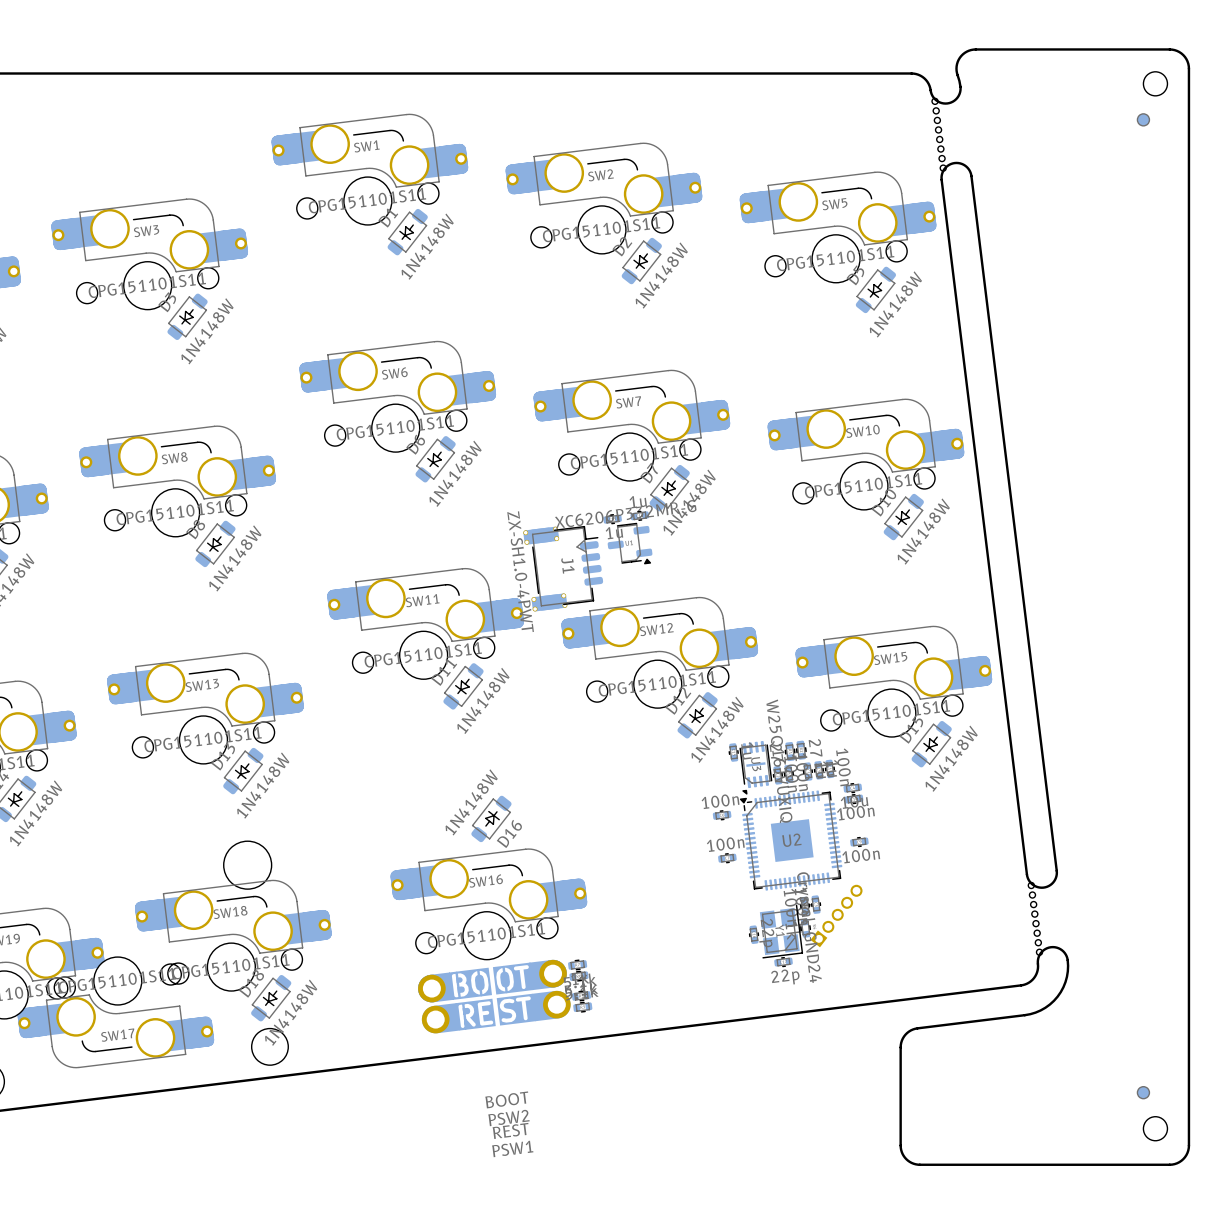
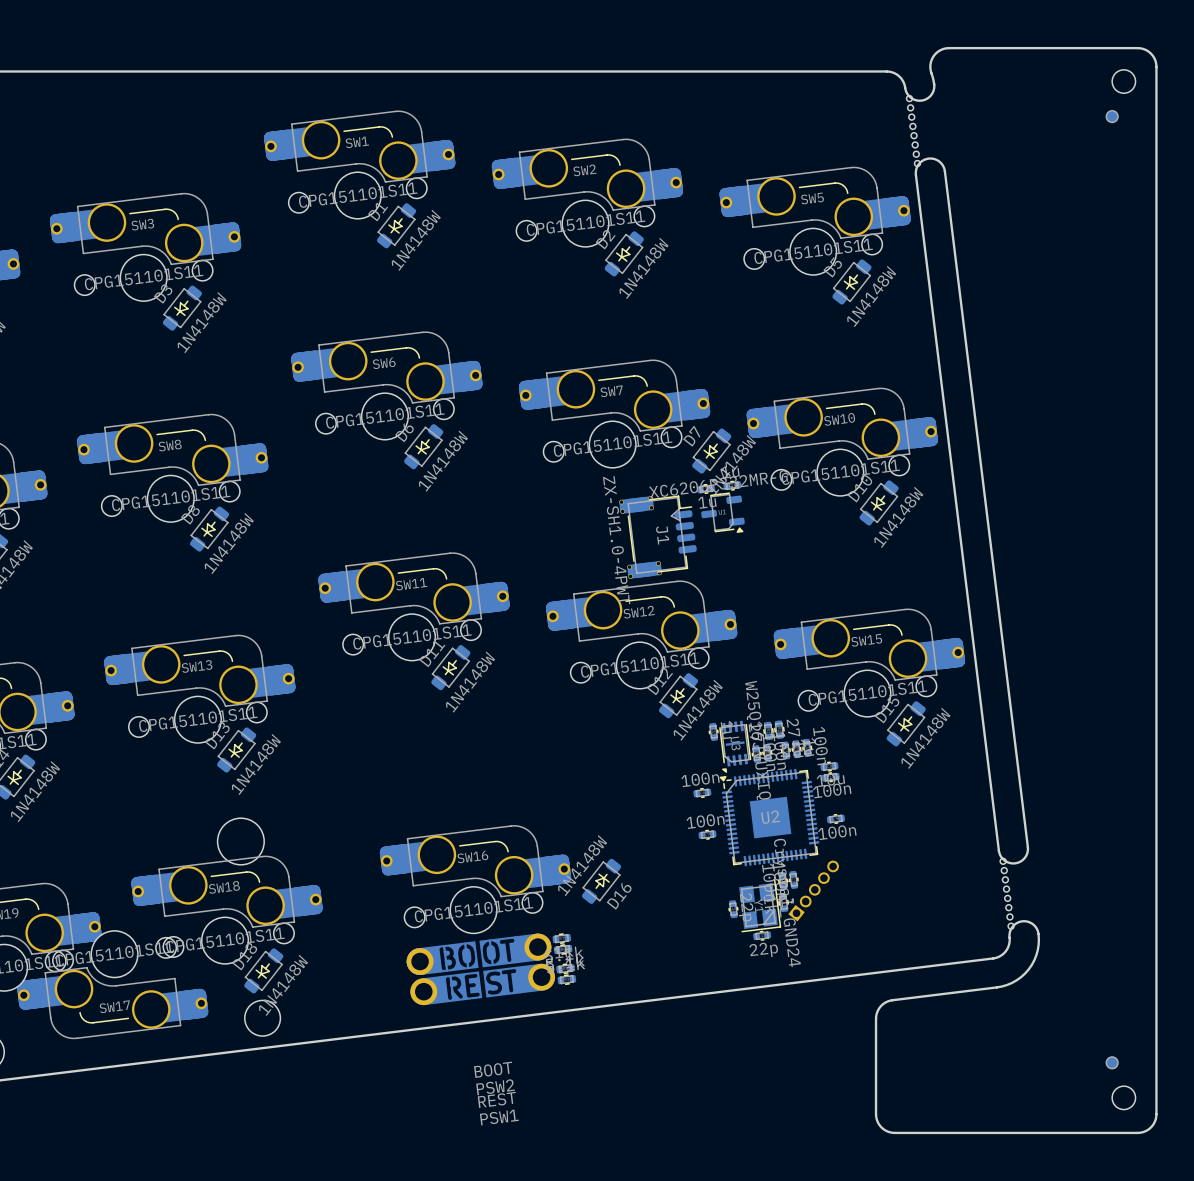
D7 position: (669, 488) -> (711, 451)
part position: (639, 515) -> (732, 485)
part position: (612, 519) -> (706, 488)
J1 footprint: [523, 525, 604, 612] -> [619, 495, 697, 579]
part position: (630, 543) -> (722, 512)
D16 position: (491, 818) -> (601, 881)

